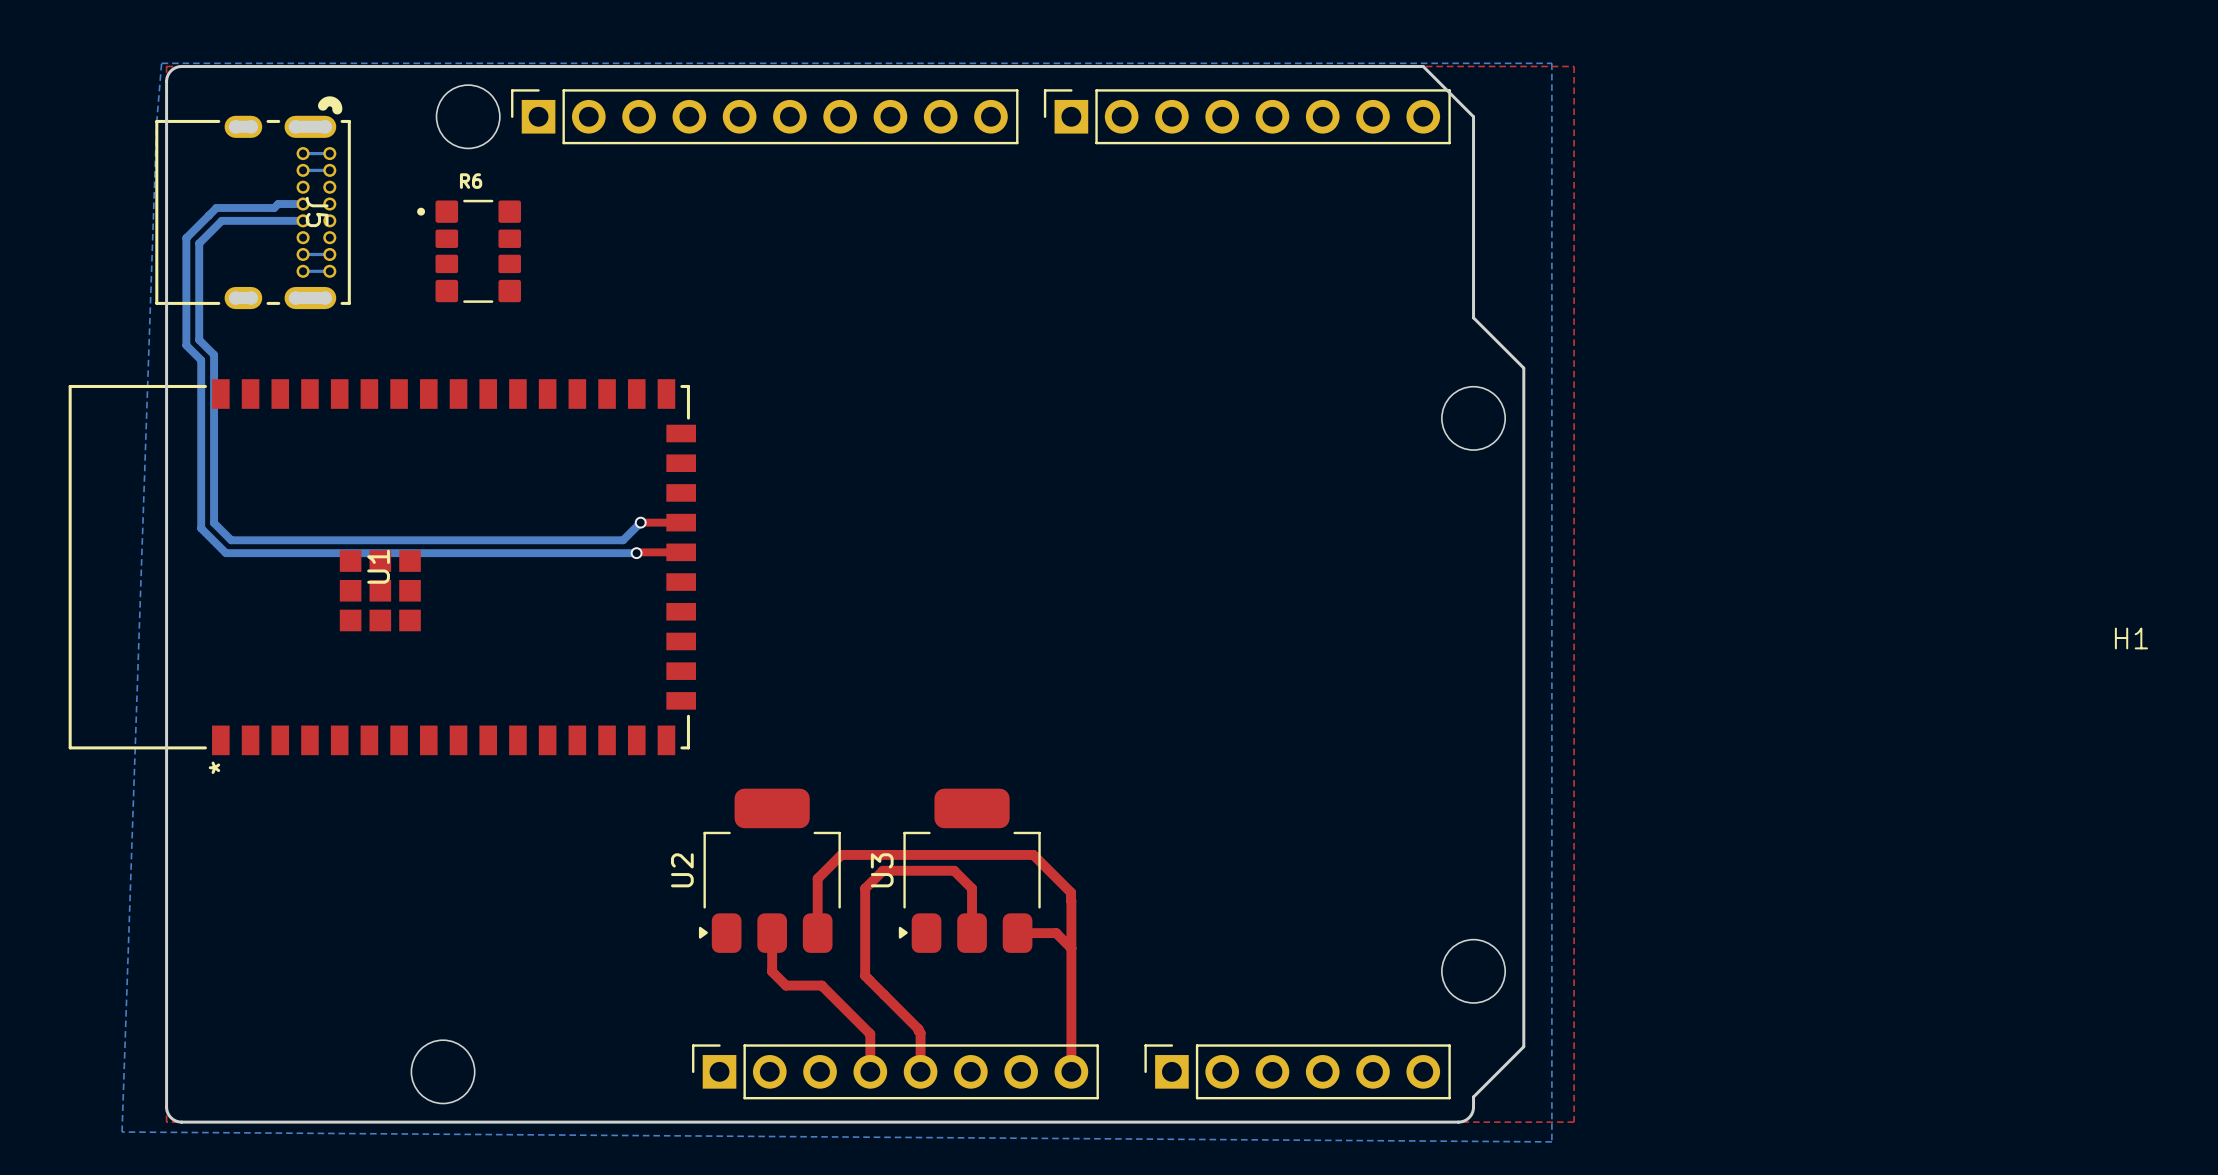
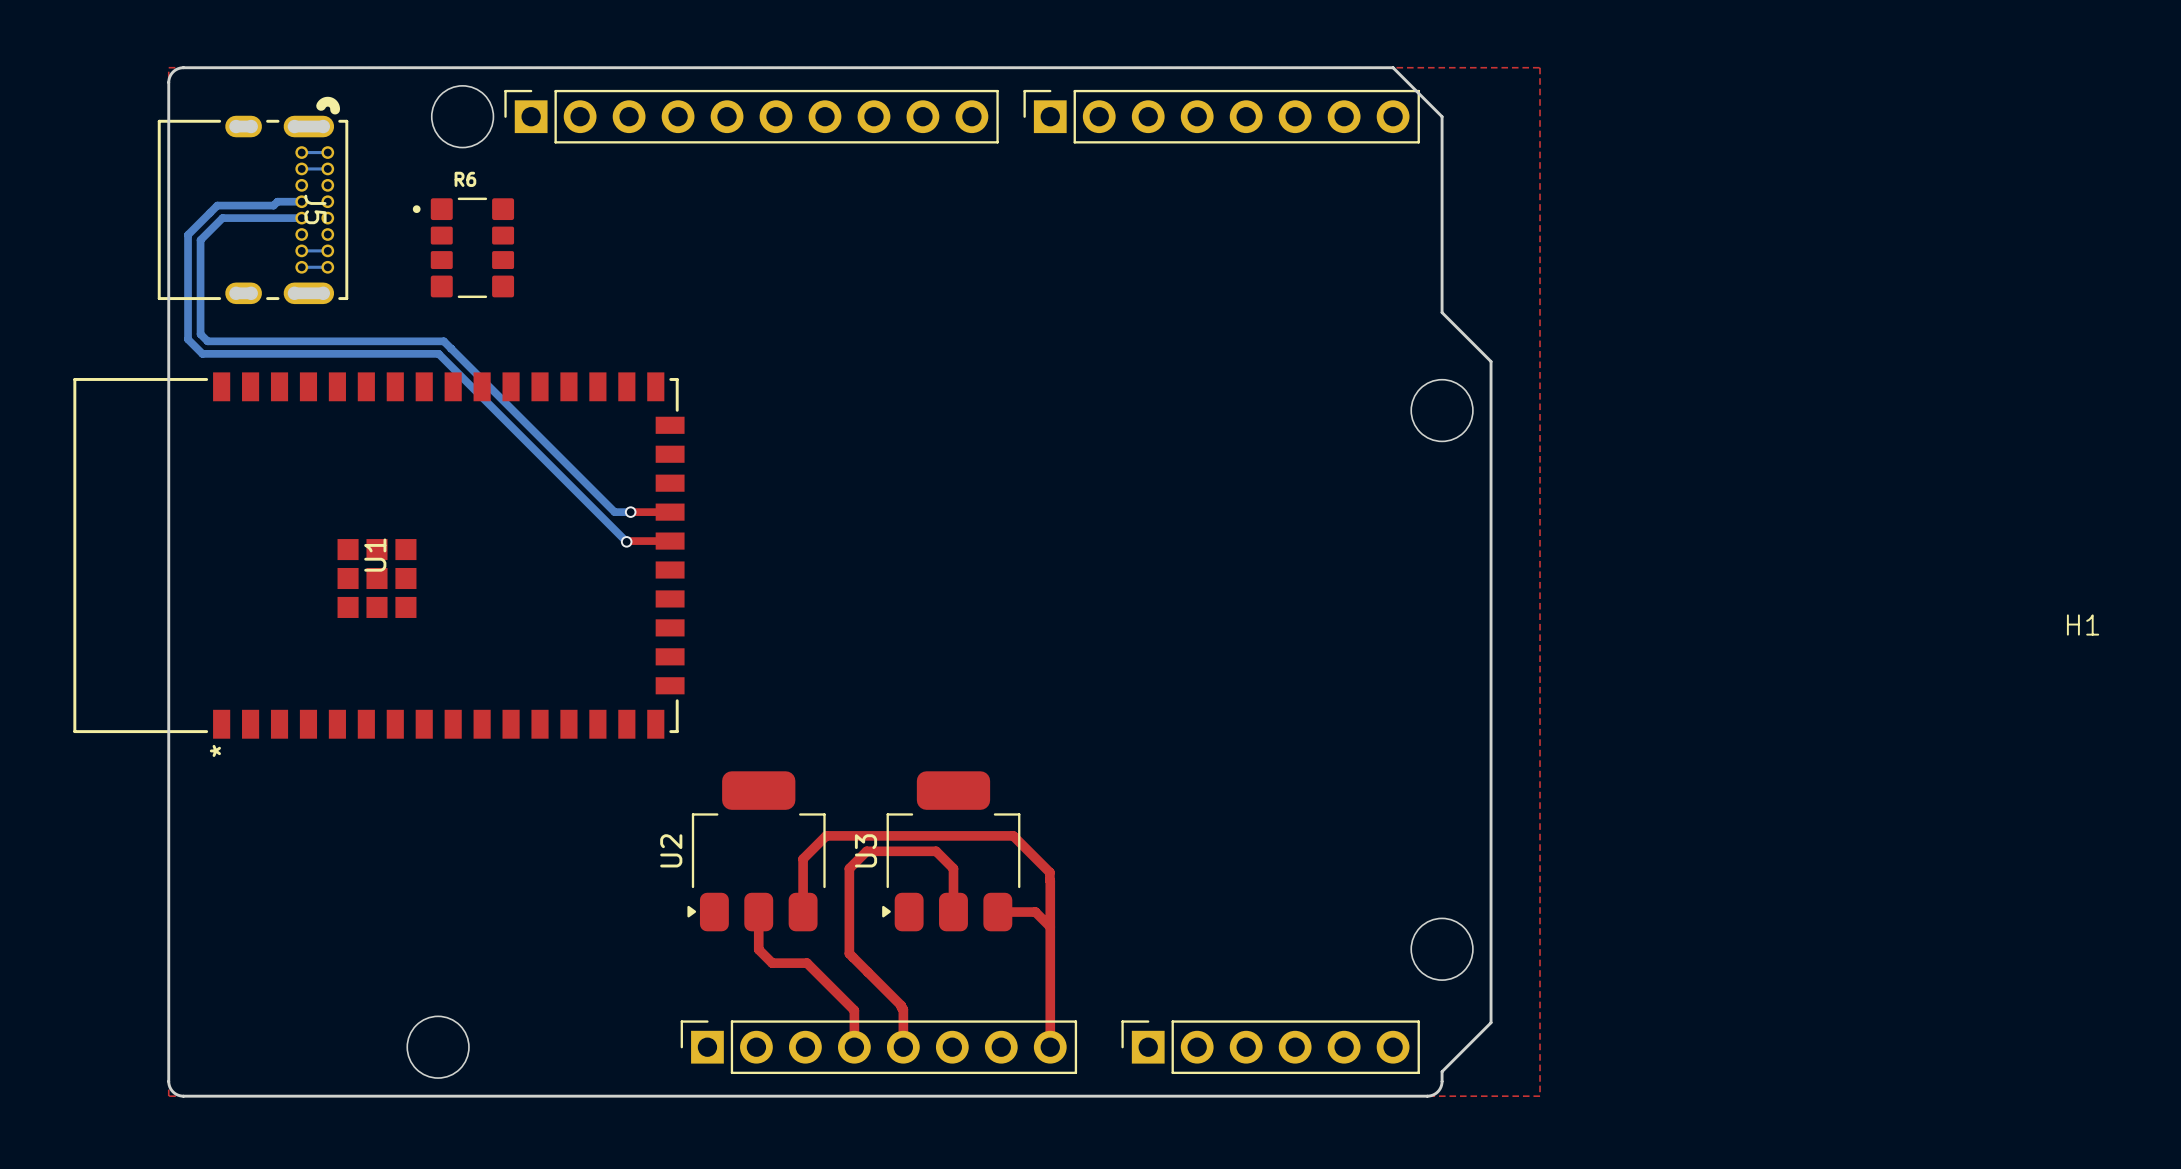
bottom zone outline: (161, 63) (1551, 63) (1551, 1141) (122, 1132) (156, 122) (161, 63) -> none
bottom track: (206, 347) (214, 354) (214, 523) (231, 540) (623, 540) (640, 522) -> (207, 341) (443, 341) (614, 512) (630, 512)
bottom track: (201, 360) (201, 528) (225, 553) (636, 553) -> (202, 353) (438, 353) (626, 541)

